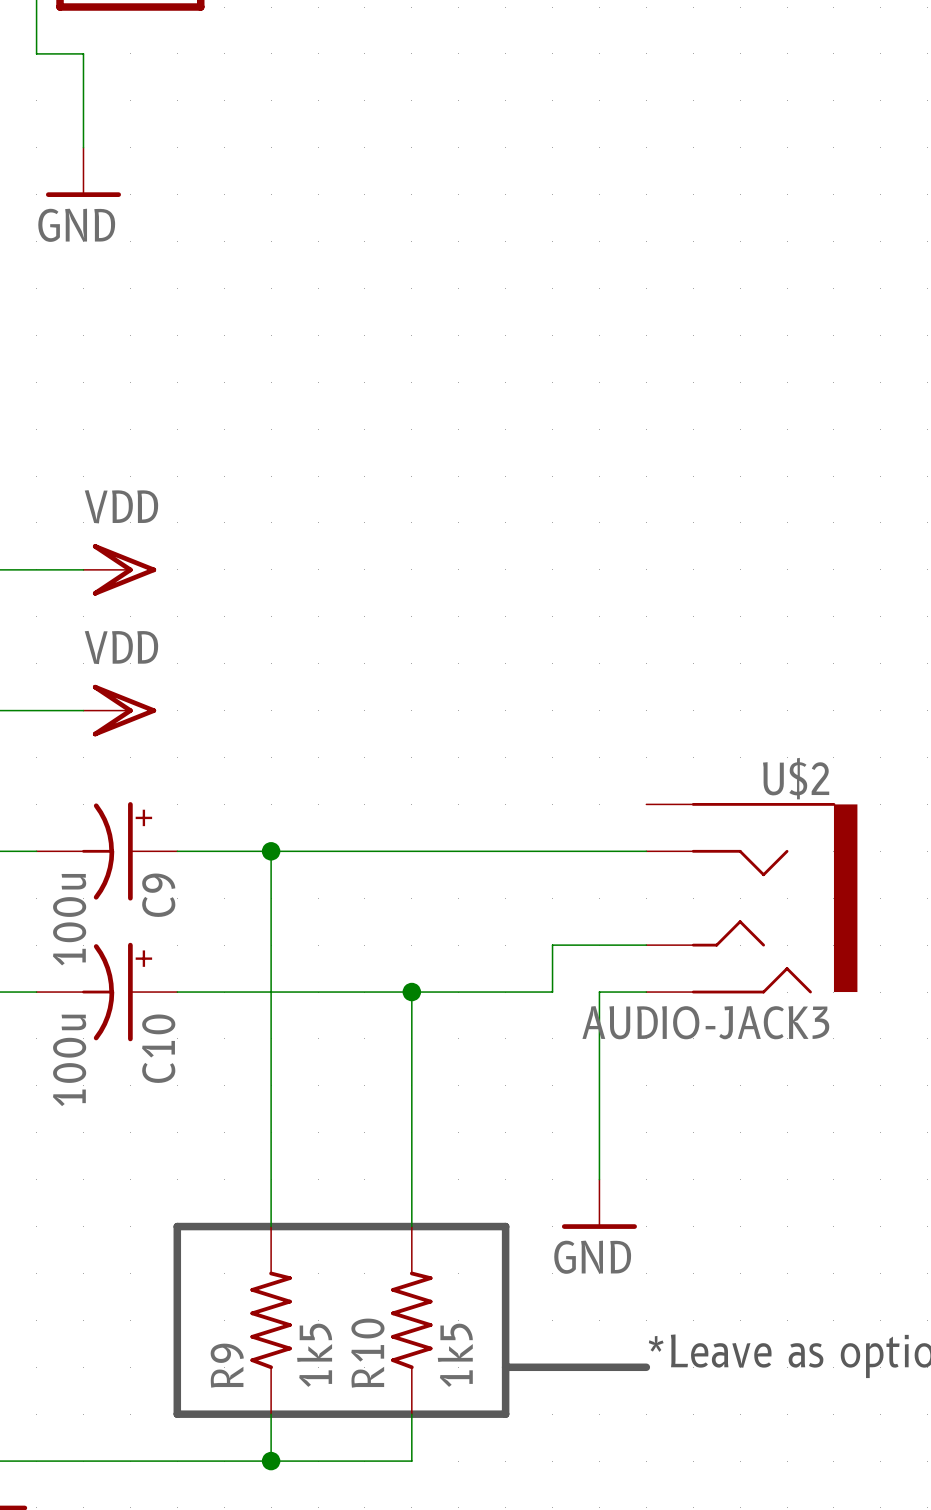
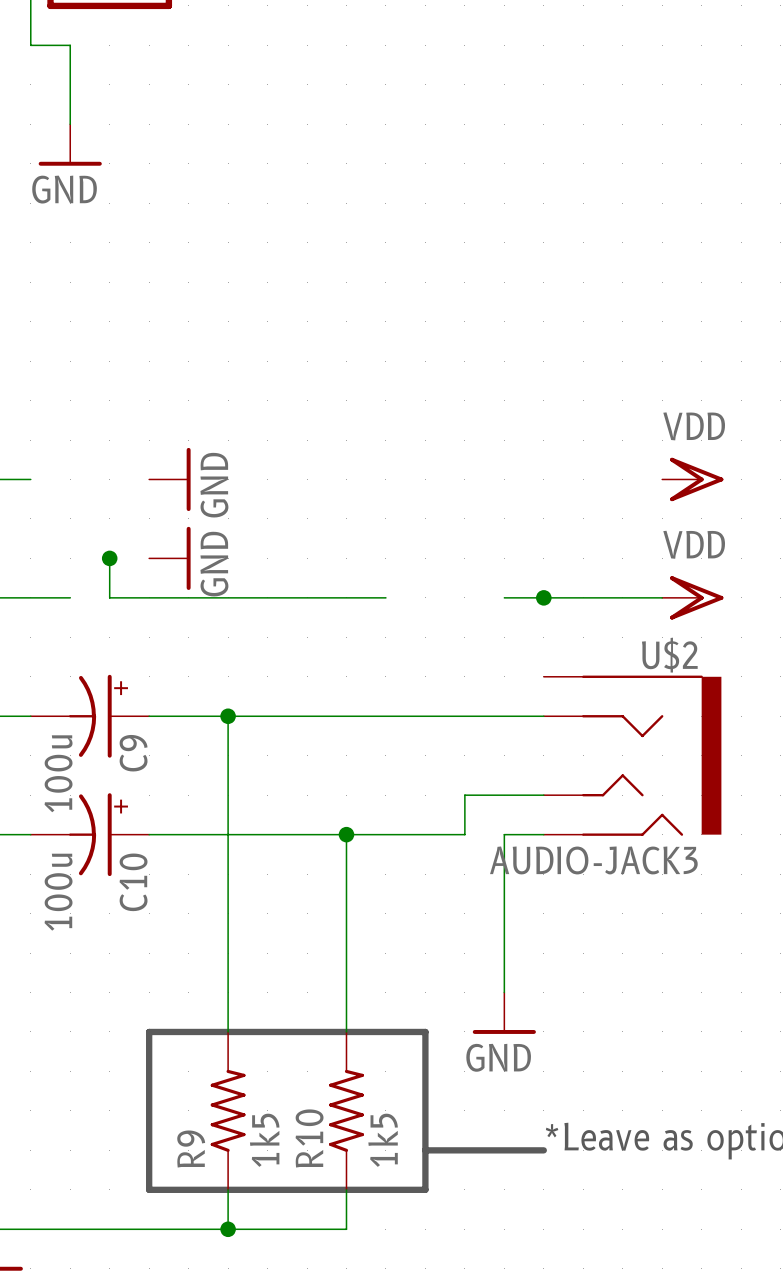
wire: (36, 569) (83, 569) -> none
power symbol: VDD (119, 569) -> none
power symbol: none -> GND (169, 479)
power symbol: none -> VDD (692, 479)
wire: none -> (109, 558) (109, 597) (385, 597)
junction: none -> (109, 558)
power symbol: none -> GND (169, 558)
power symbol: VDD (119, 710) -> none
wire: none -> (504, 597) (662, 597)
junction: none -> (543, 597)
power symbol: none -> VDD (692, 597)

